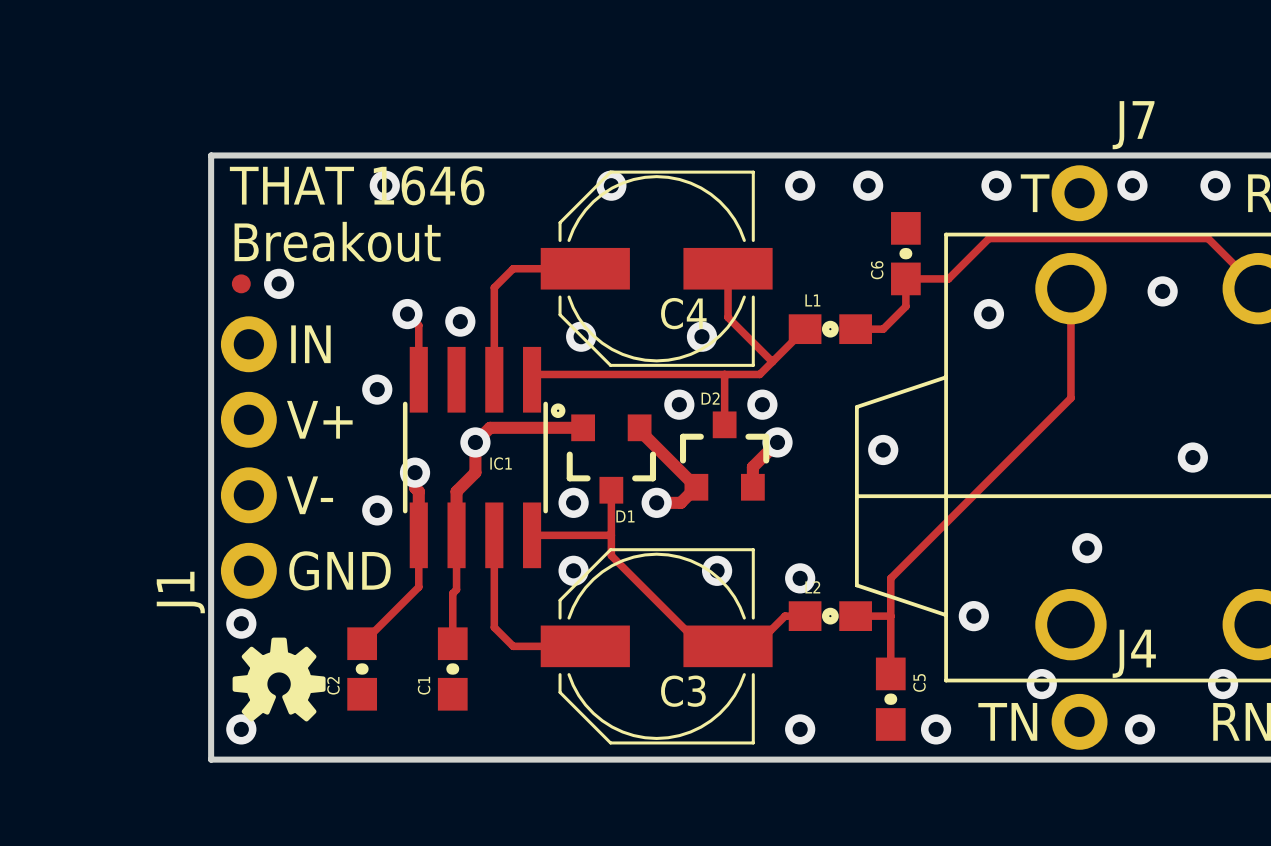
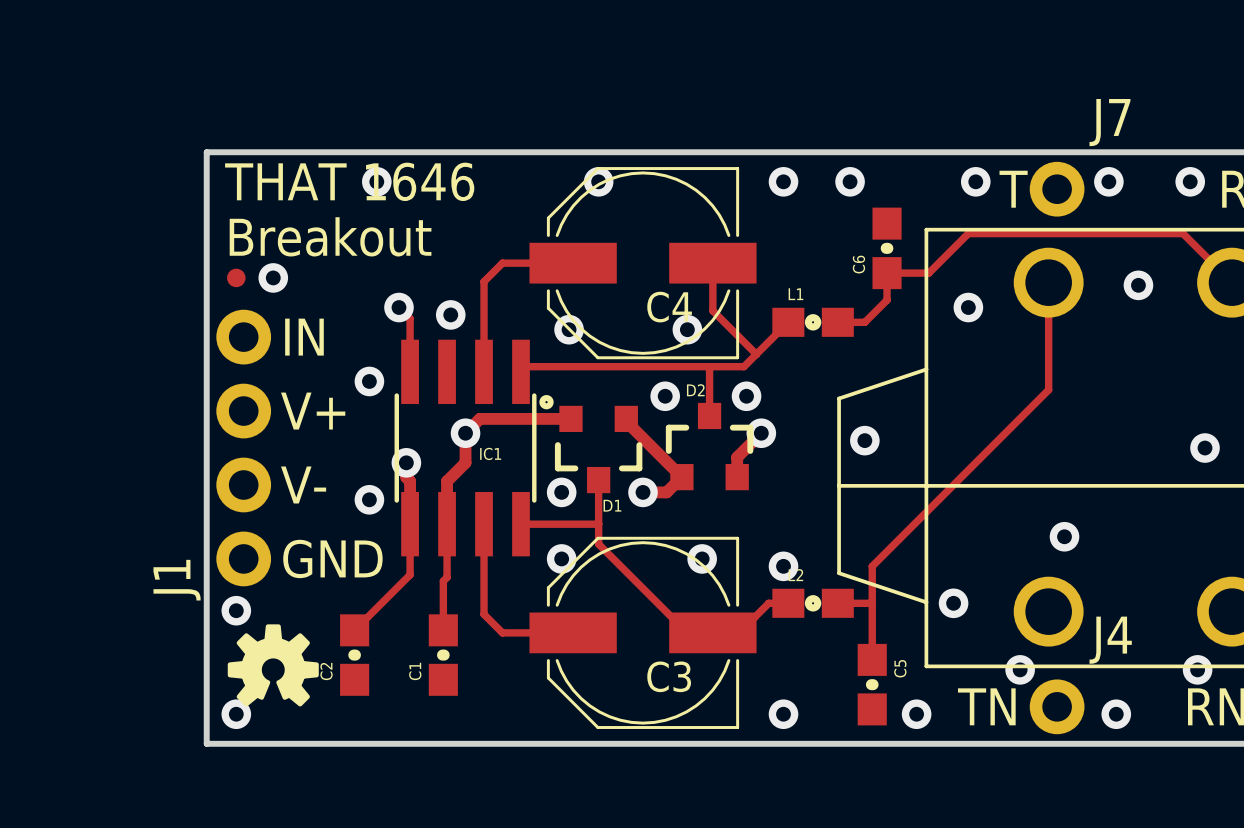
via position: (1192, 457) -> (1205, 448)

